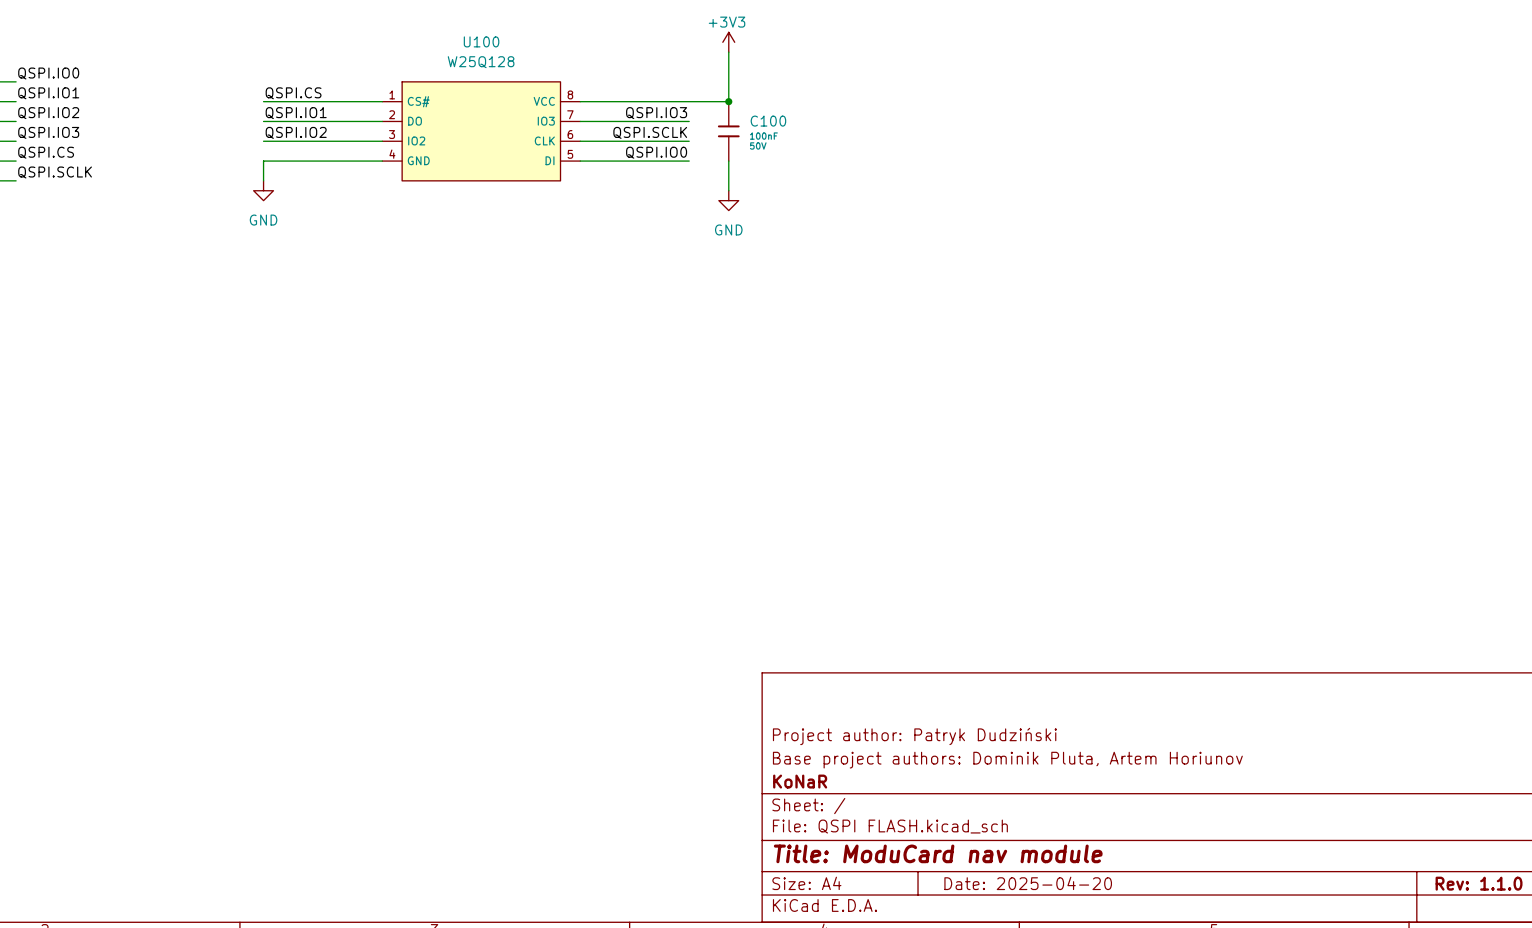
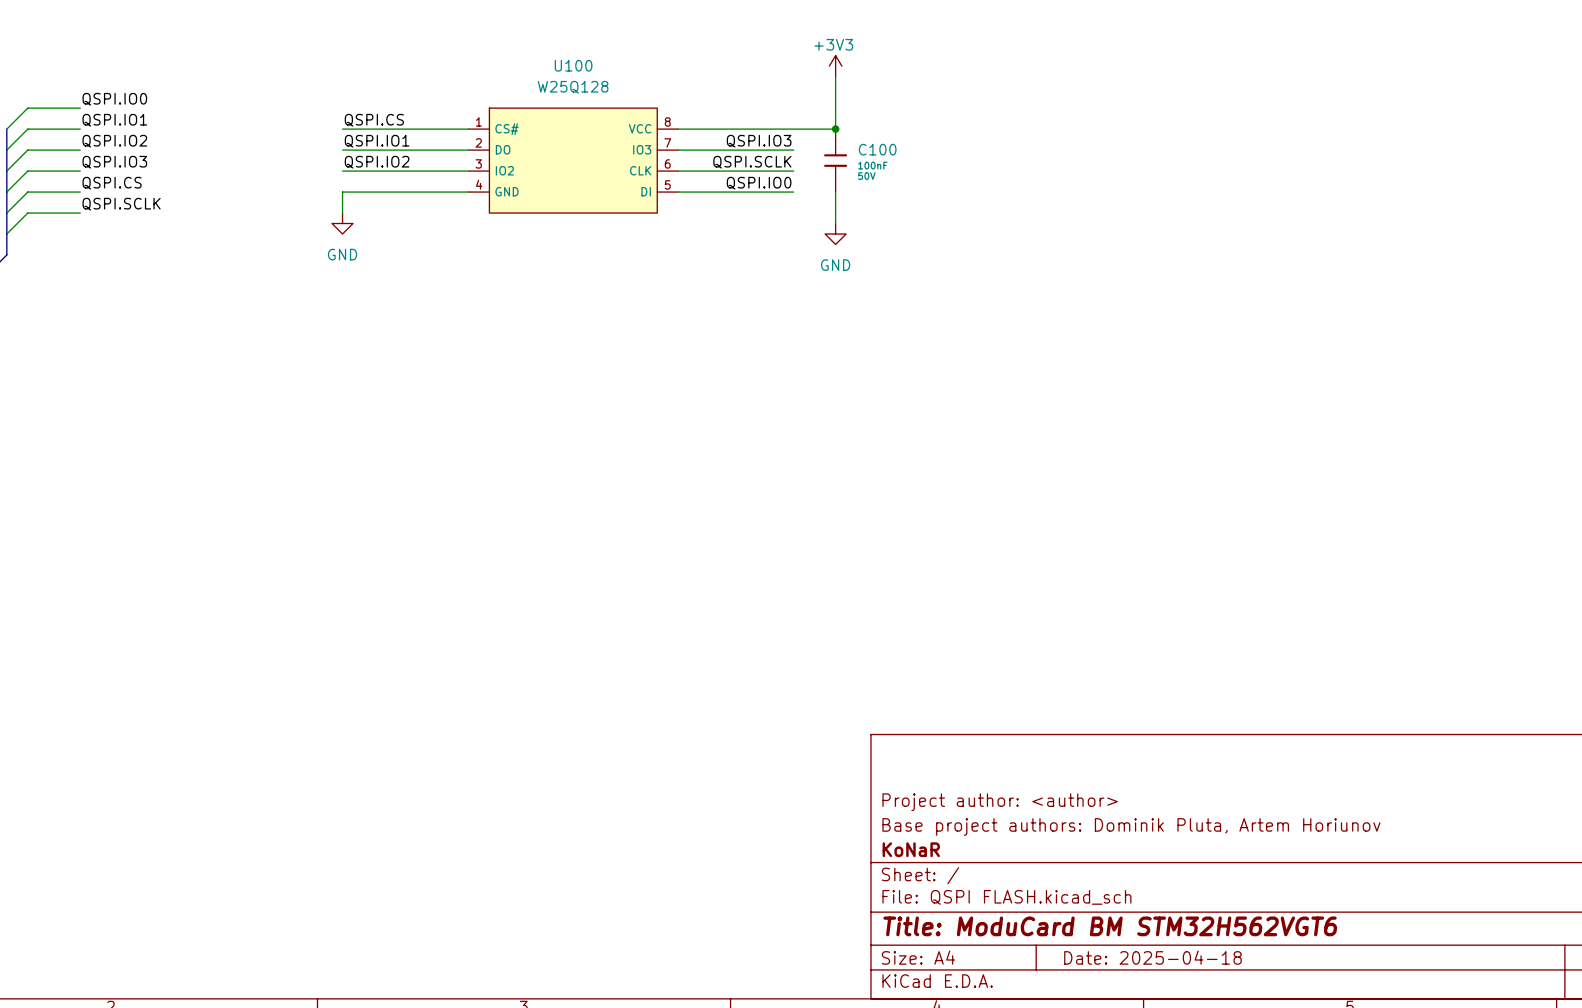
title block: Project author: Patryk Dudziński (914, 736) -> Project author: <author> (1000, 802)
title block: Title: ModuCard nav module (938, 853) -> Title: ModuCard BM STM32H562VGT6 (1110, 926)
title block: Date: 2025-04-20 (1028, 883) -> Date: 2025-04-18 (1152, 957)

